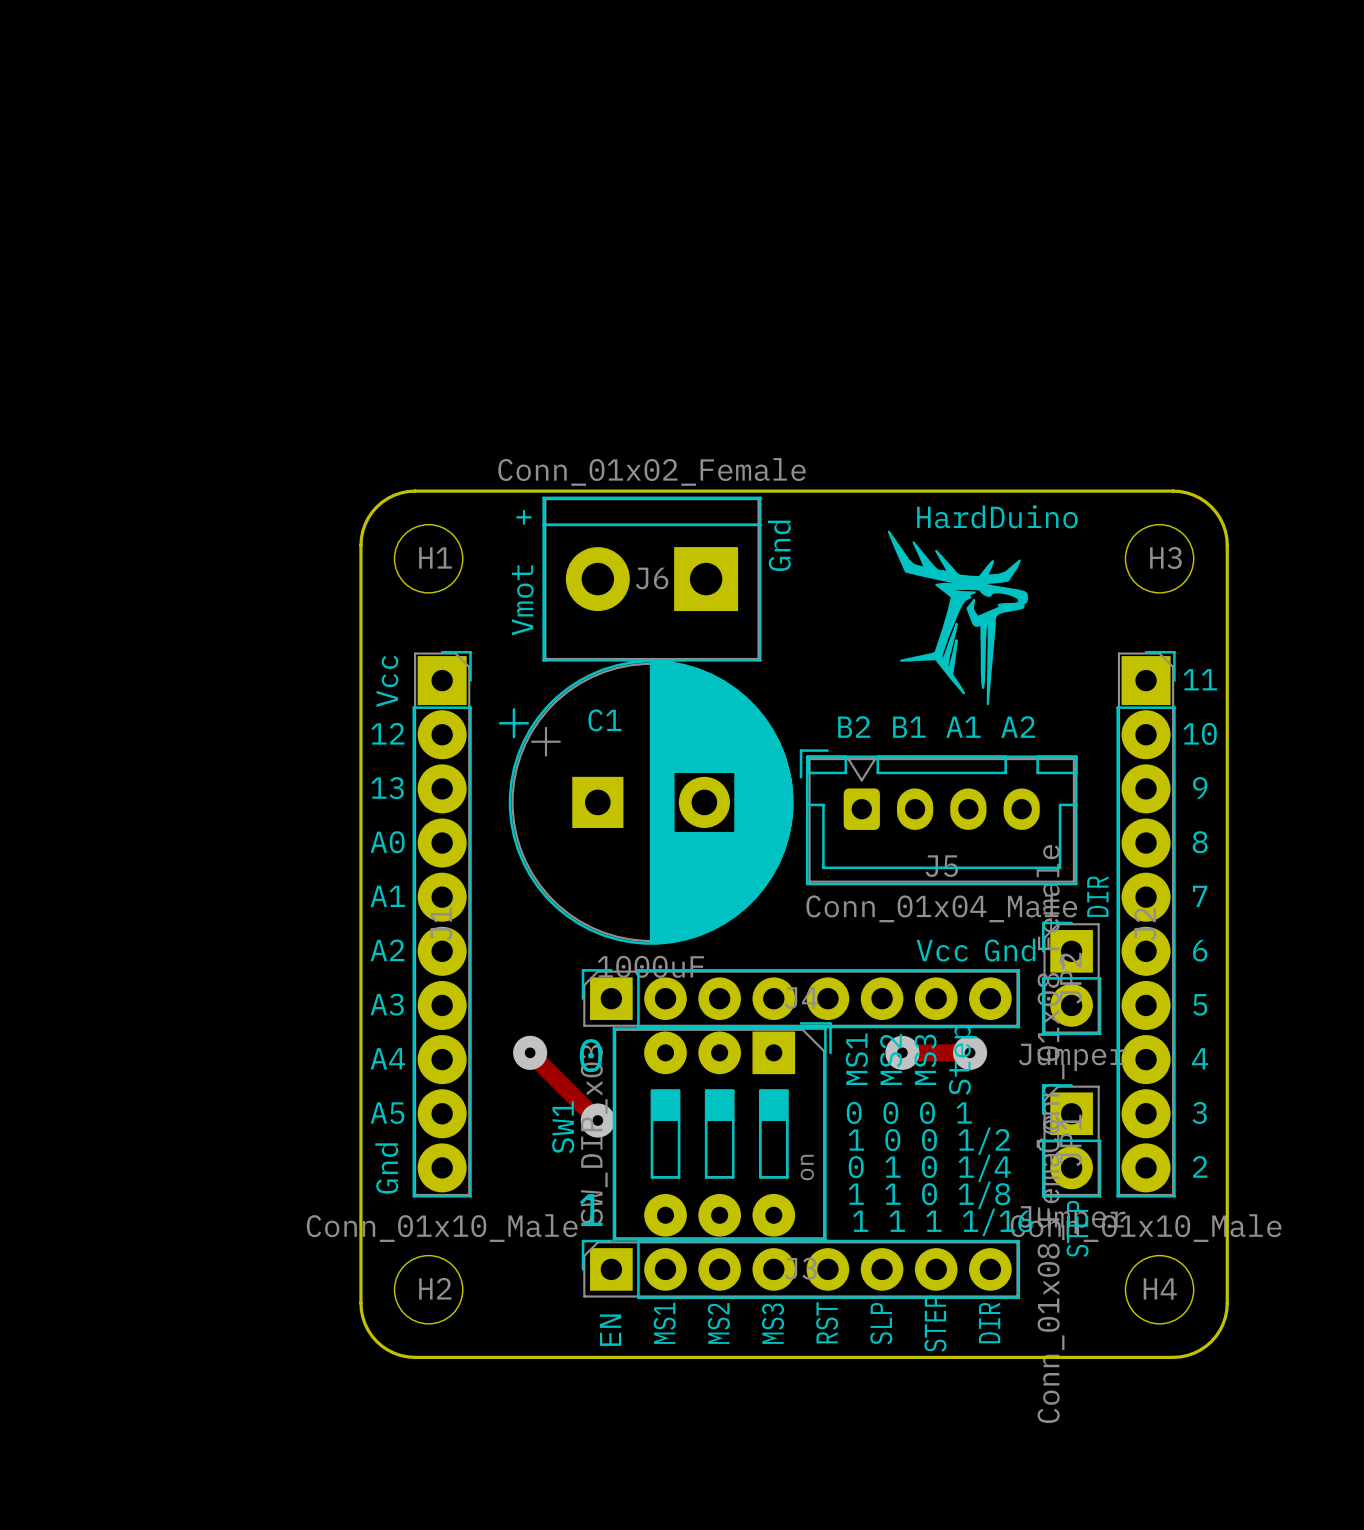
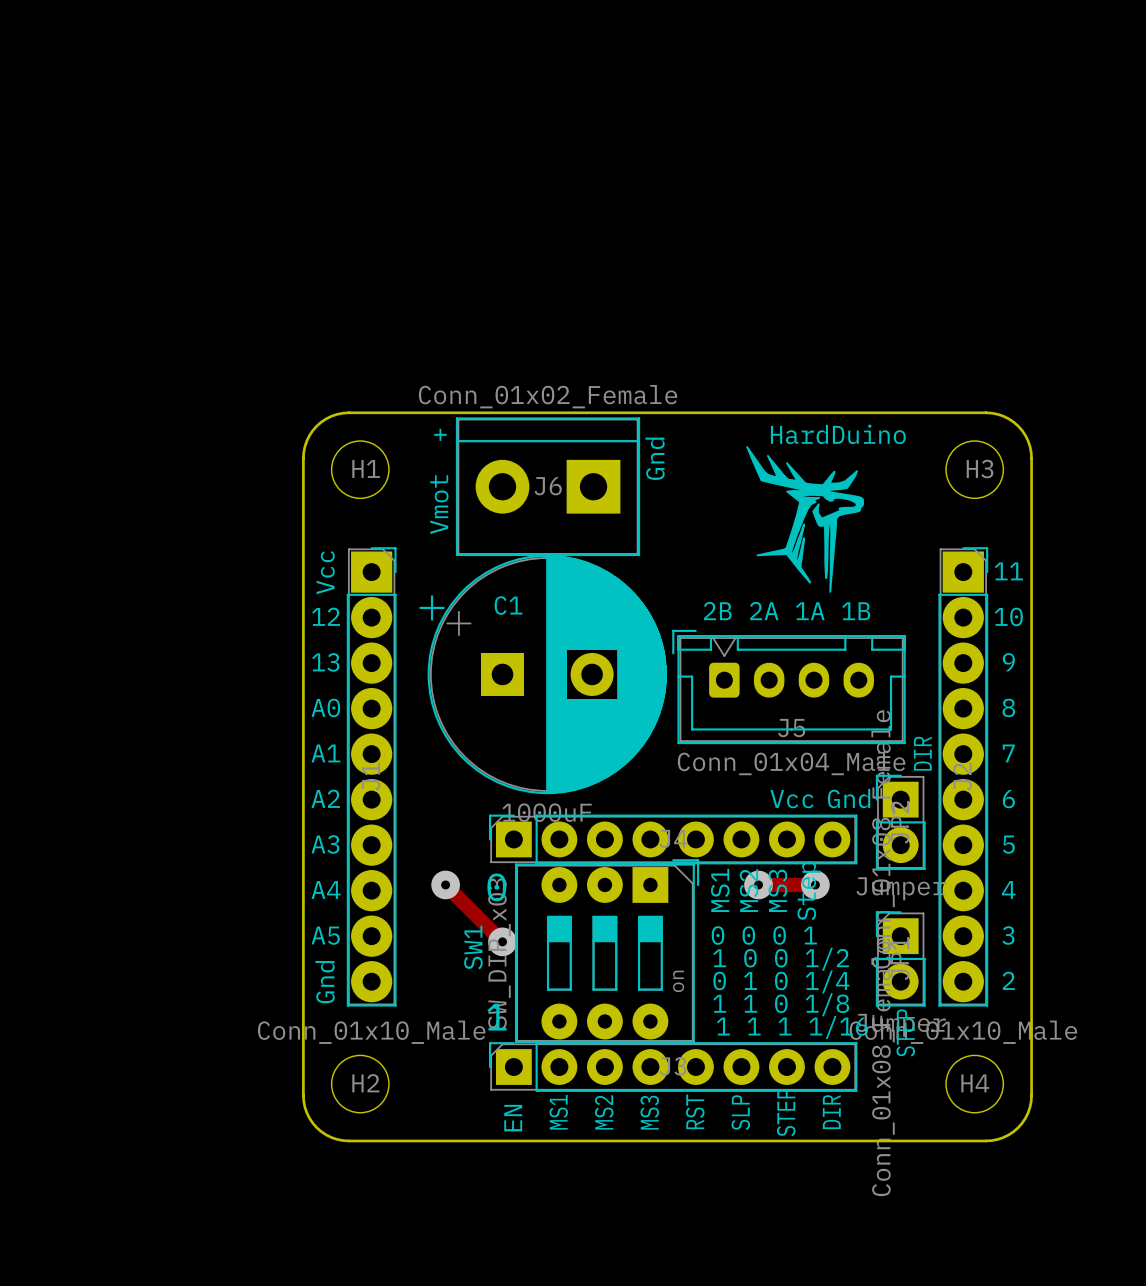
text: B2 B1 A1 A2 (936, 726) -> 2B 2A 1A 1B (787, 611)

